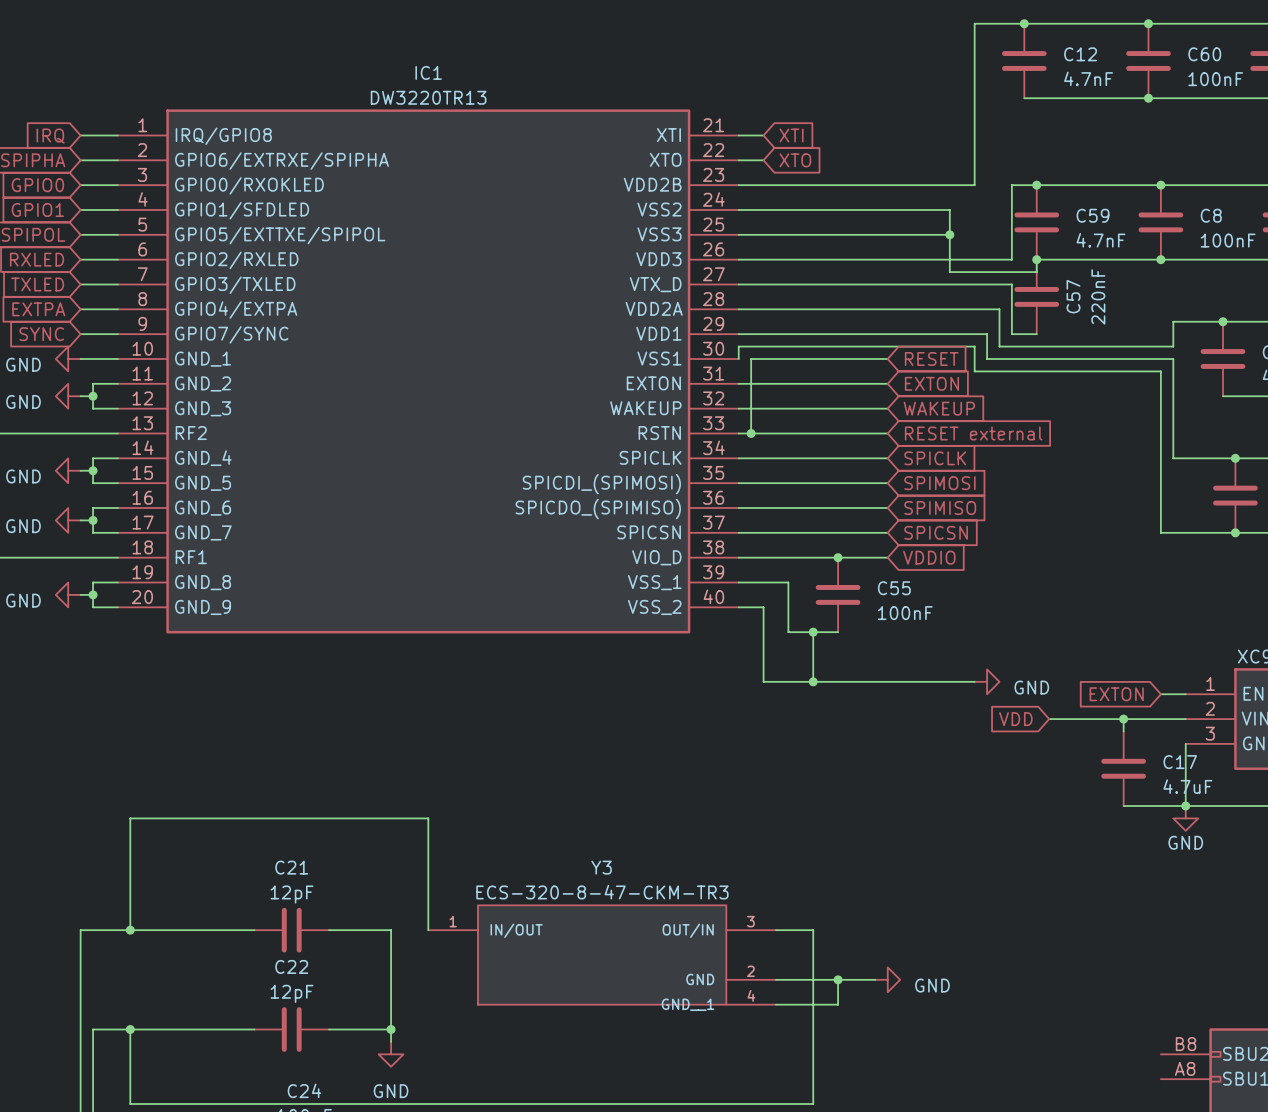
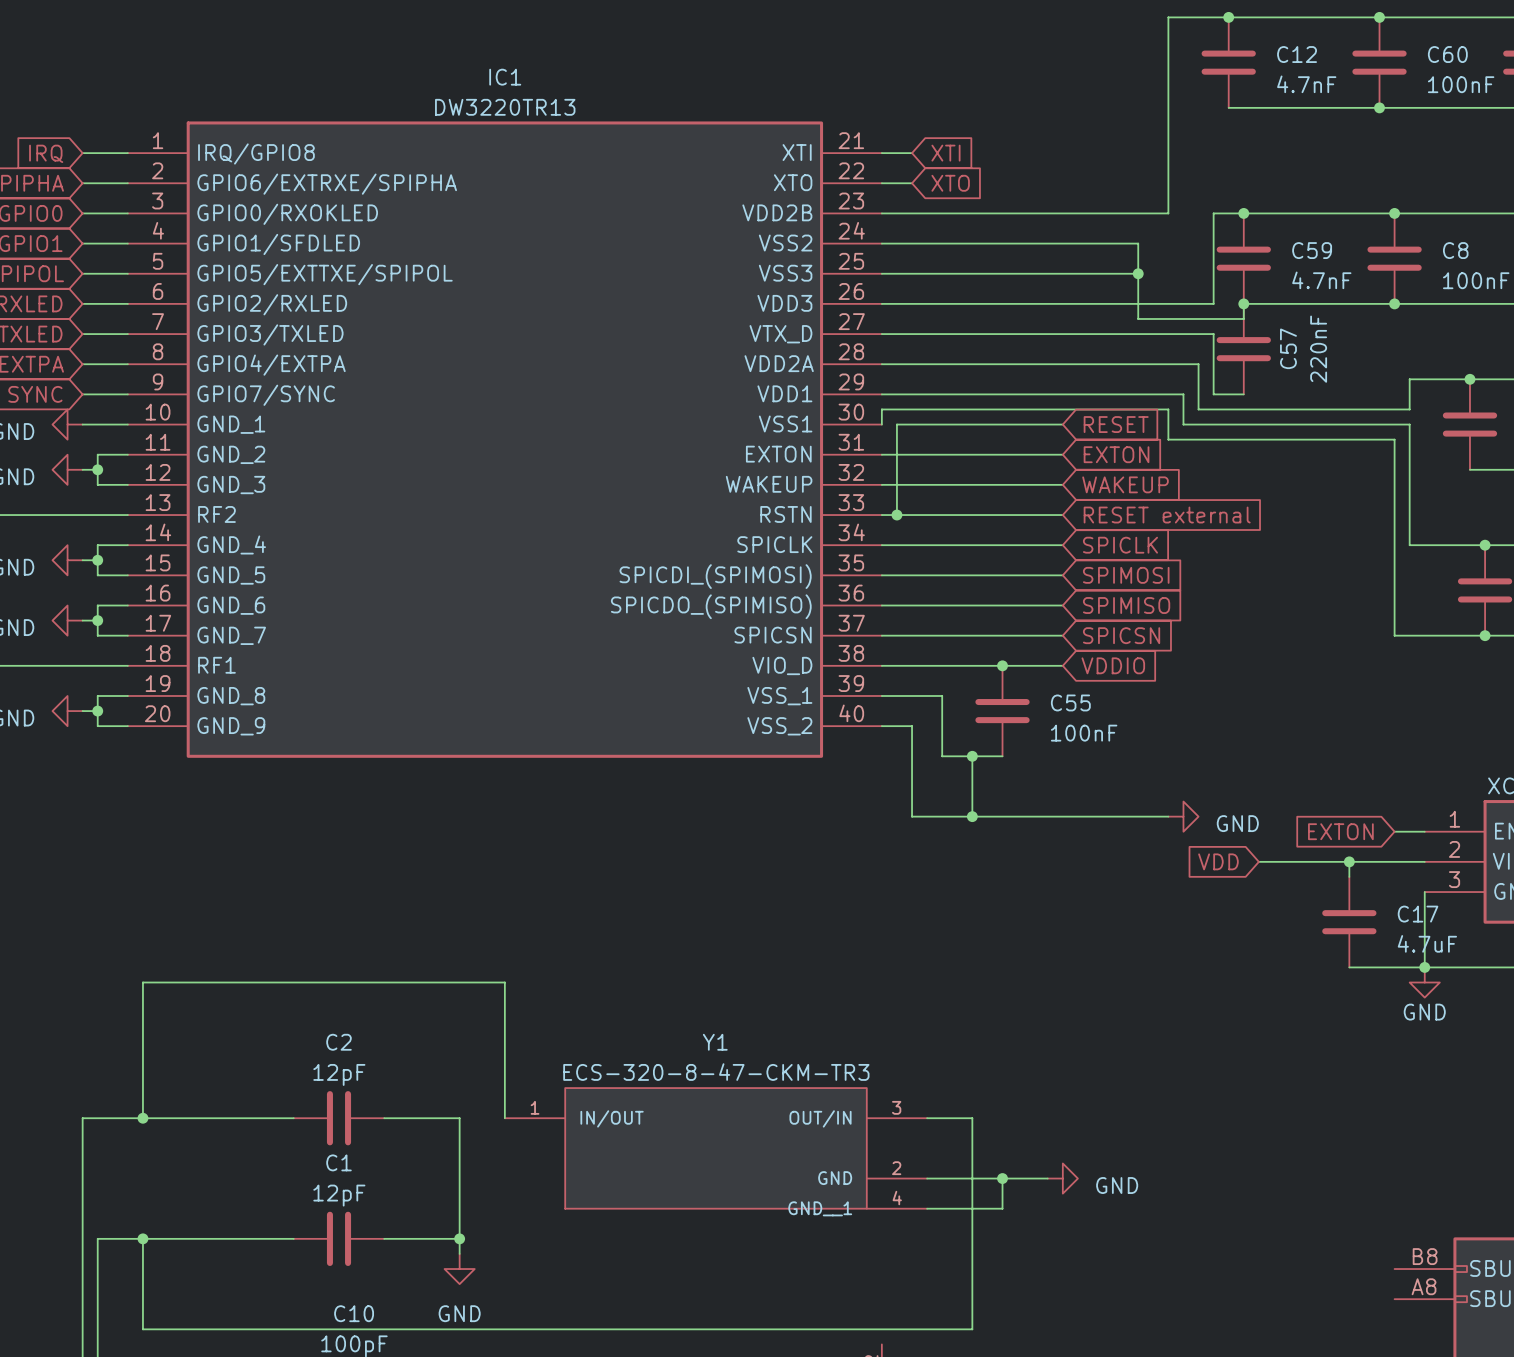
C21 name: C21 (291, 867) -> C2 (339, 1042)
Y3 name: Y3 (601, 867) -> Y1 (715, 1042)
C22 name: C22 (291, 966) -> C1 (339, 1162)
C24 name: C24 (304, 1090) -> C10 (354, 1313)

